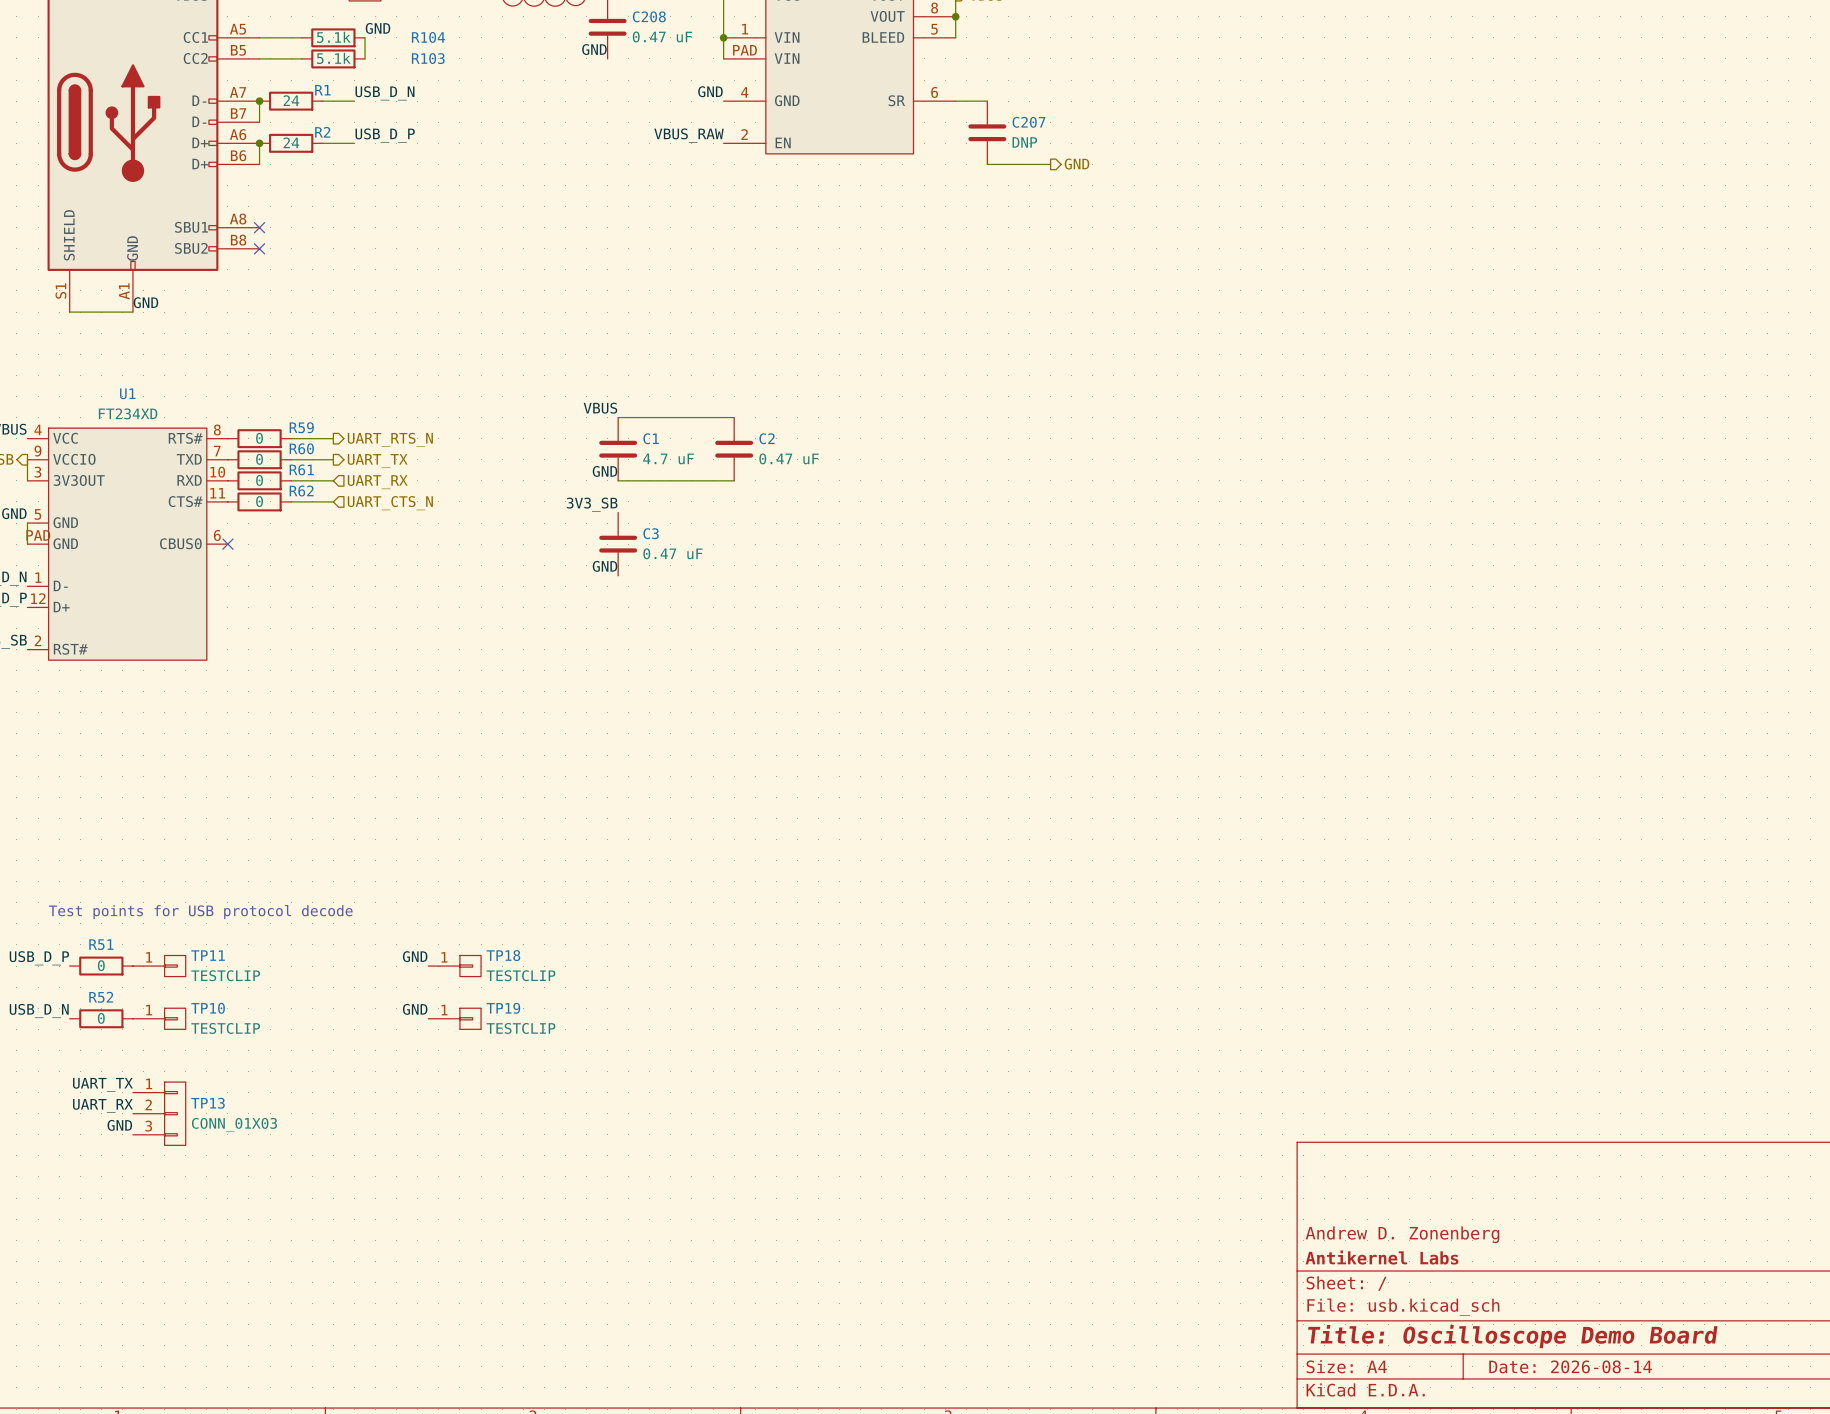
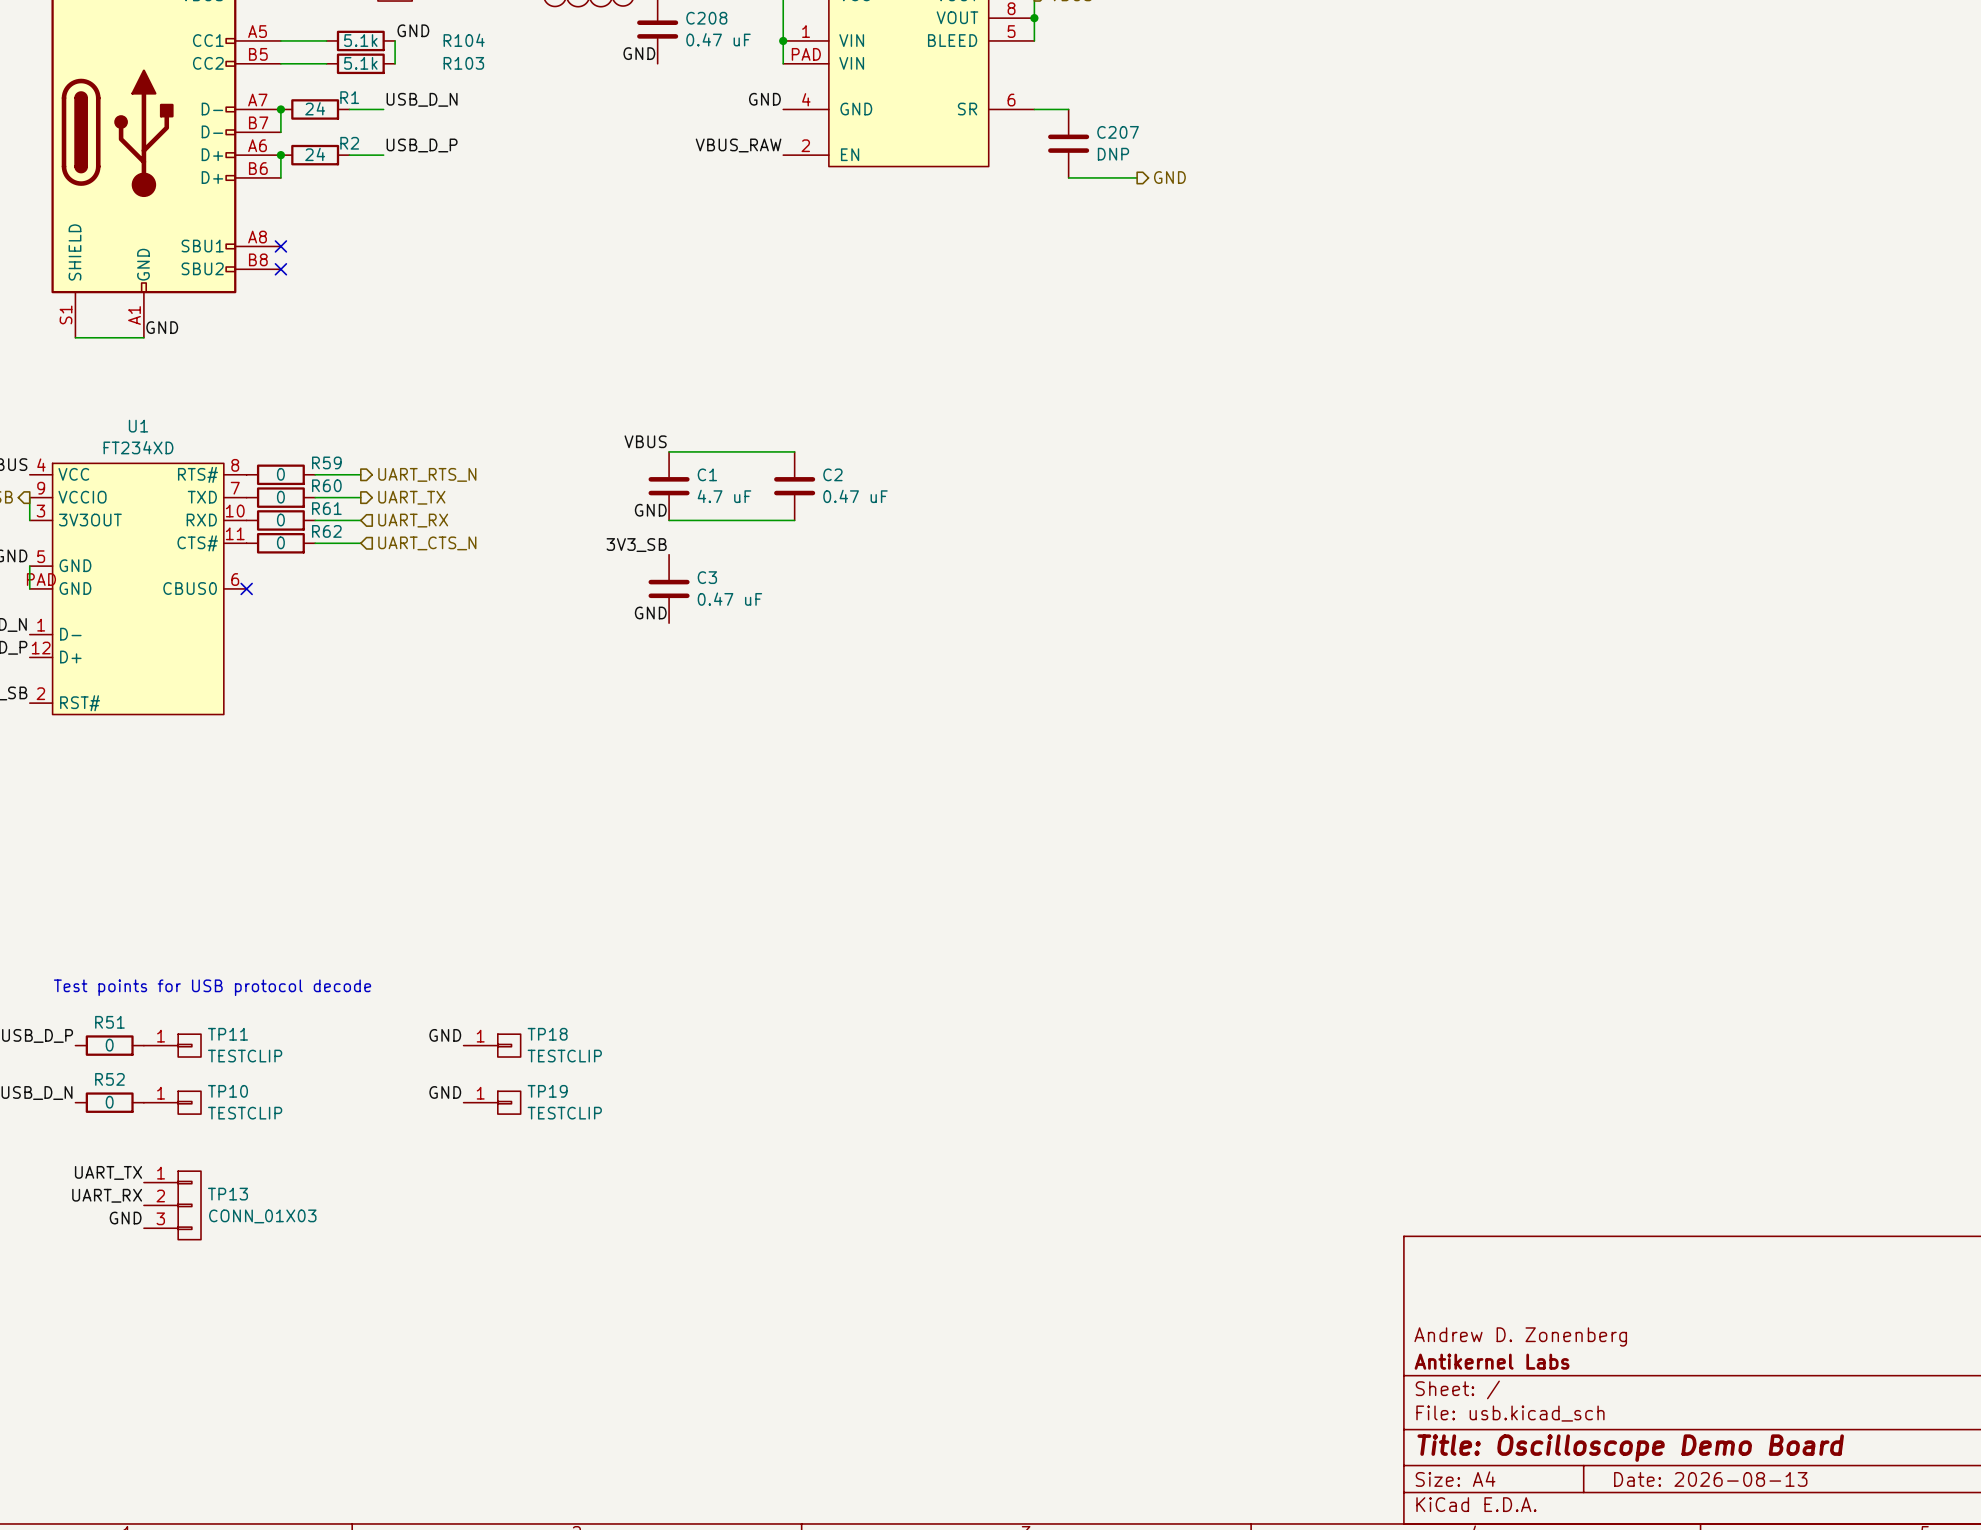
title block: Date: 2026-08-14 (1570, 1366) -> Date: 2026-08-13 (1710, 1479)

